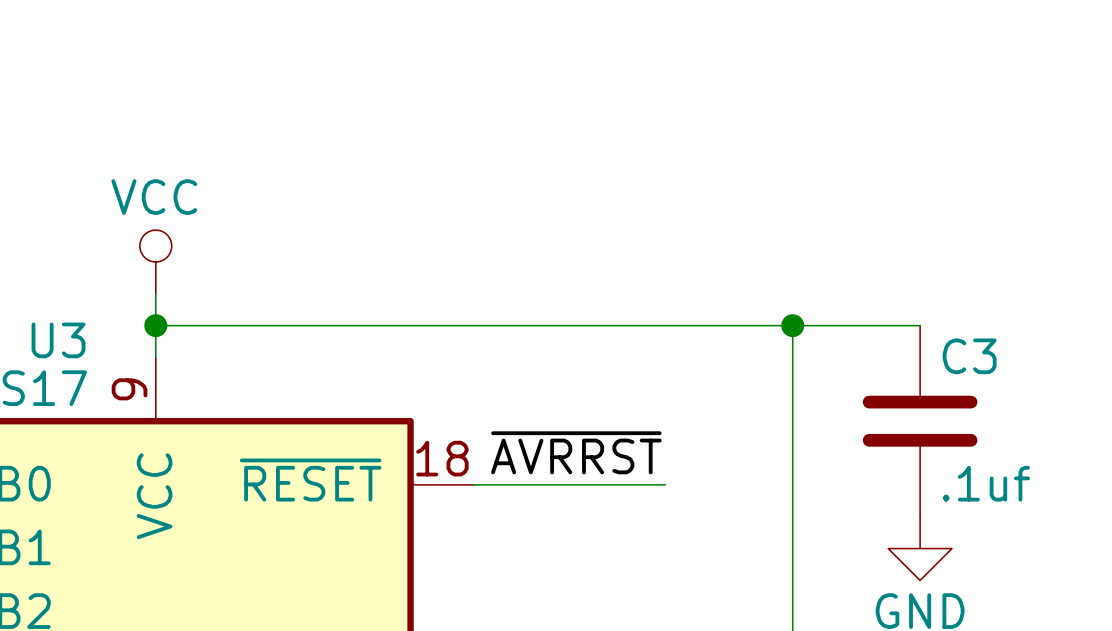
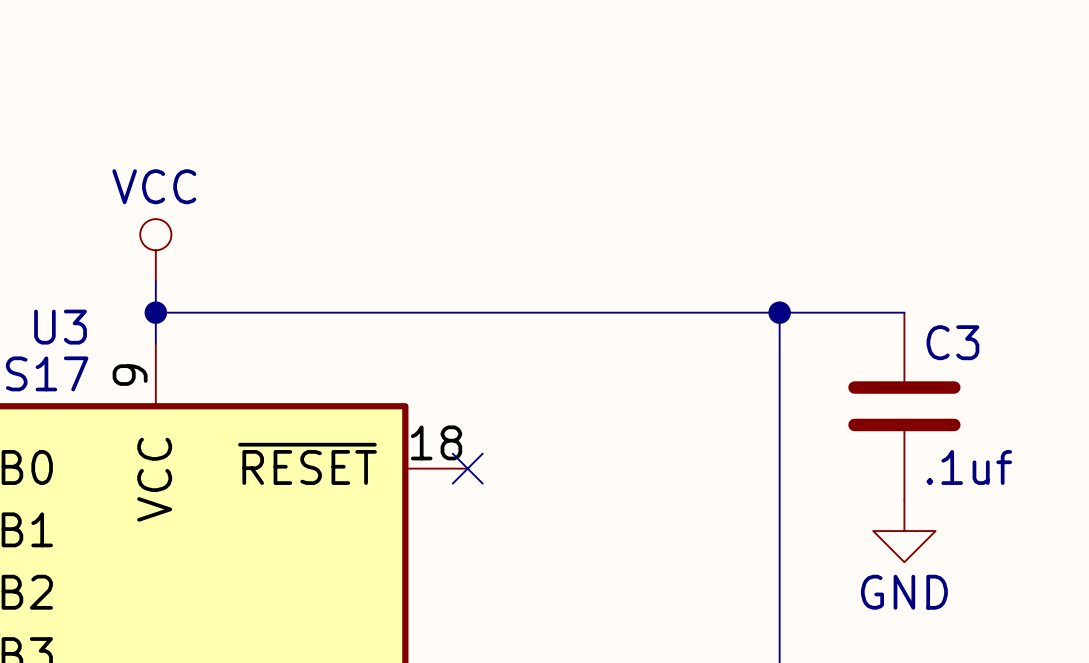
label: ~{AVRRST} (576, 452) -> none
wire: (474, 484) (665, 484) -> none
no-connect mark: none -> (467, 468)

